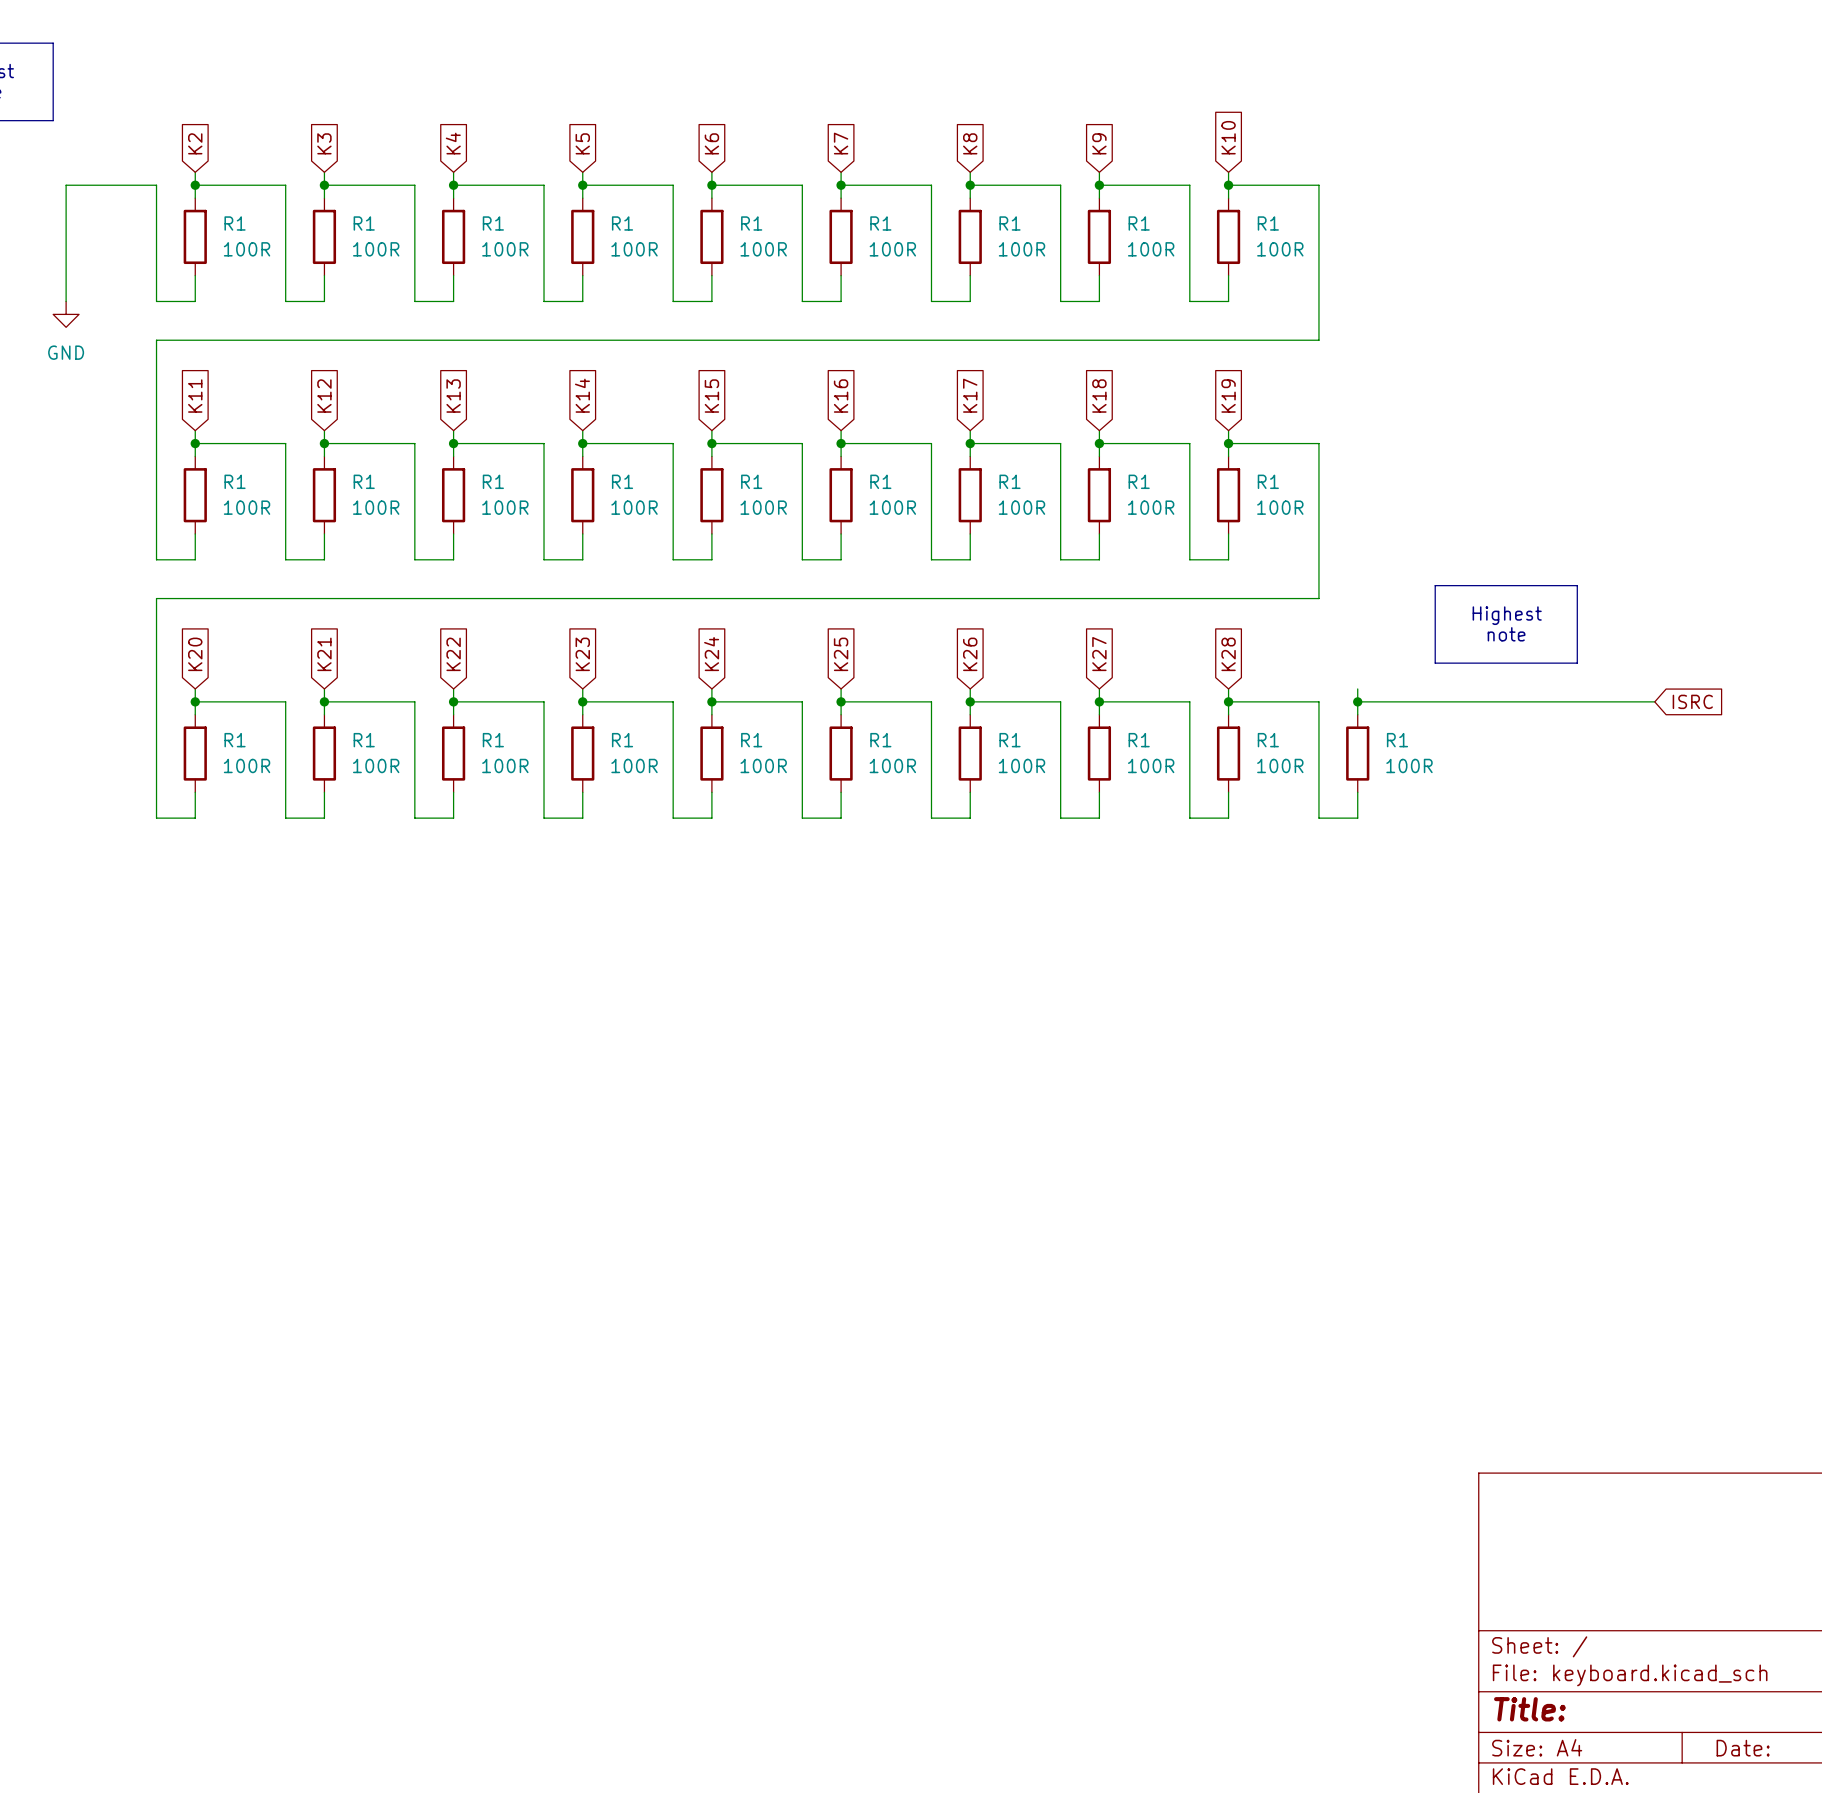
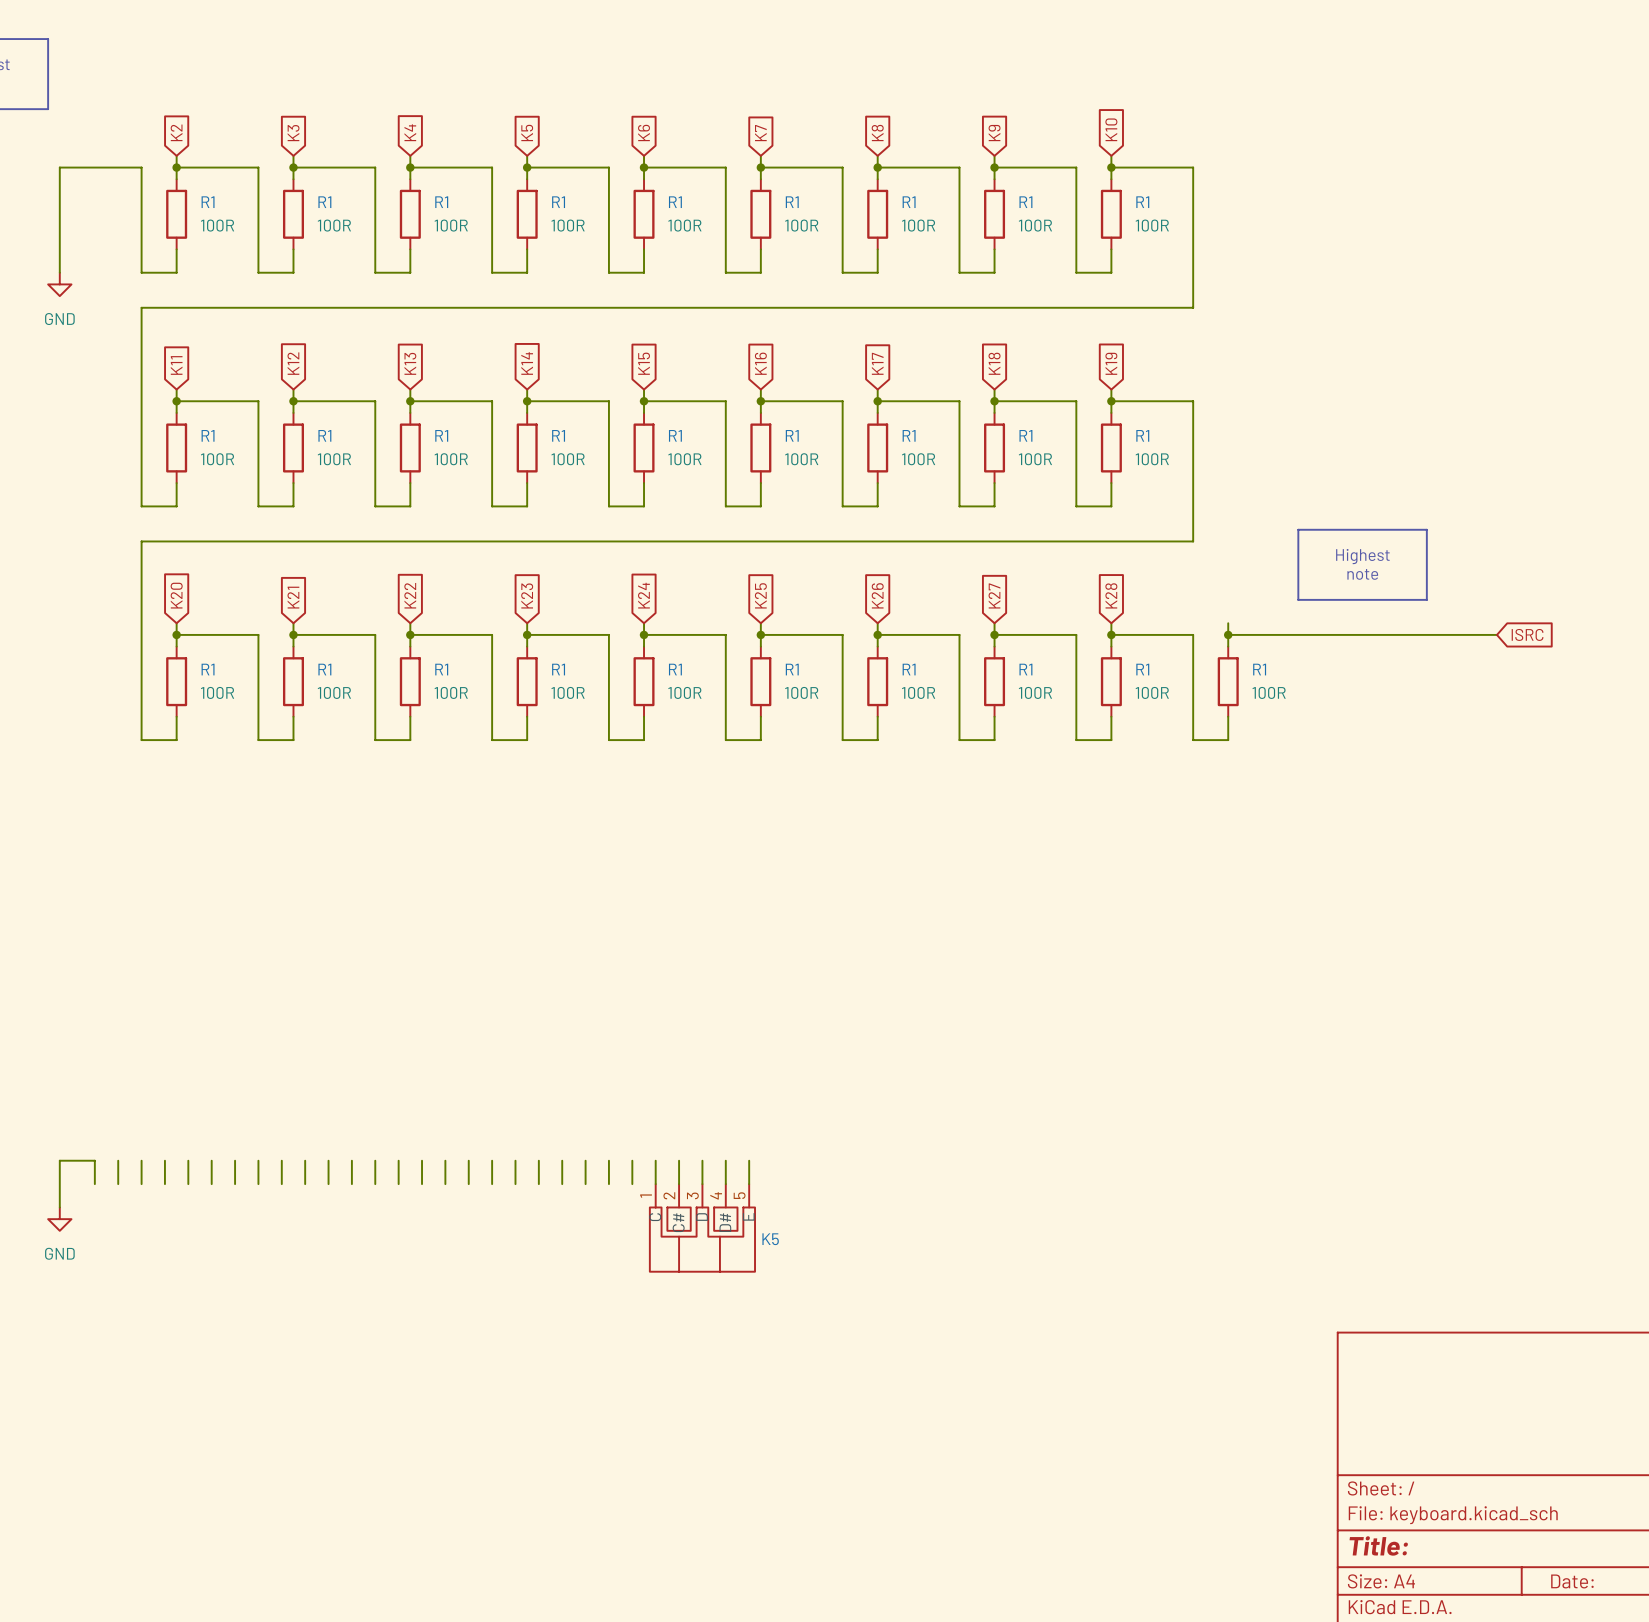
wire: none -> (118, 1160) (118, 1184)
wire: none -> (141, 1160) (141, 1184)
wire: none -> (164, 1160) (164, 1184)
wire: none -> (188, 1160) (188, 1184)
wire: none -> (211, 1160) (211, 1184)
wire: none -> (235, 1160) (235, 1184)
wire: none -> (258, 1160) (258, 1184)
wire: none -> (281, 1160) (281, 1184)
wire: none -> (305, 1160) (305, 1184)
wire: none -> (328, 1160) (328, 1184)
wire: none -> (351, 1160) (351, 1184)
wire: none -> (375, 1160) (375, 1184)
wire: none -> (398, 1160) (398, 1184)
wire: none -> (422, 1160) (422, 1184)
wire: none -> (445, 1160) (445, 1184)
wire: none -> (468, 1160) (468, 1184)
wire: none -> (492, 1160) (492, 1184)
wire: none -> (515, 1160) (515, 1184)
wire: none -> (538, 1160) (538, 1184)
wire: none -> (562, 1160) (562, 1184)
wire: none -> (585, 1160) (585, 1184)
wire: none -> (608, 1160) (608, 1184)
wire: none -> (632, 1160) (632, 1184)
wire: none -> (655, 1160) (655, 1184)
wire: none -> (679, 1160) (679, 1184)
wire: none -> (702, 1160) (702, 1184)
wire: none -> (725, 1160) (725, 1184)
wire: none -> (749, 1160) (749, 1184)
wire: none -> (94, 1184) (94, 1160) (59, 1160) (59, 1207)
power symbol: none -> GND (59, 1219)
K5: none -> (702, 1227)

